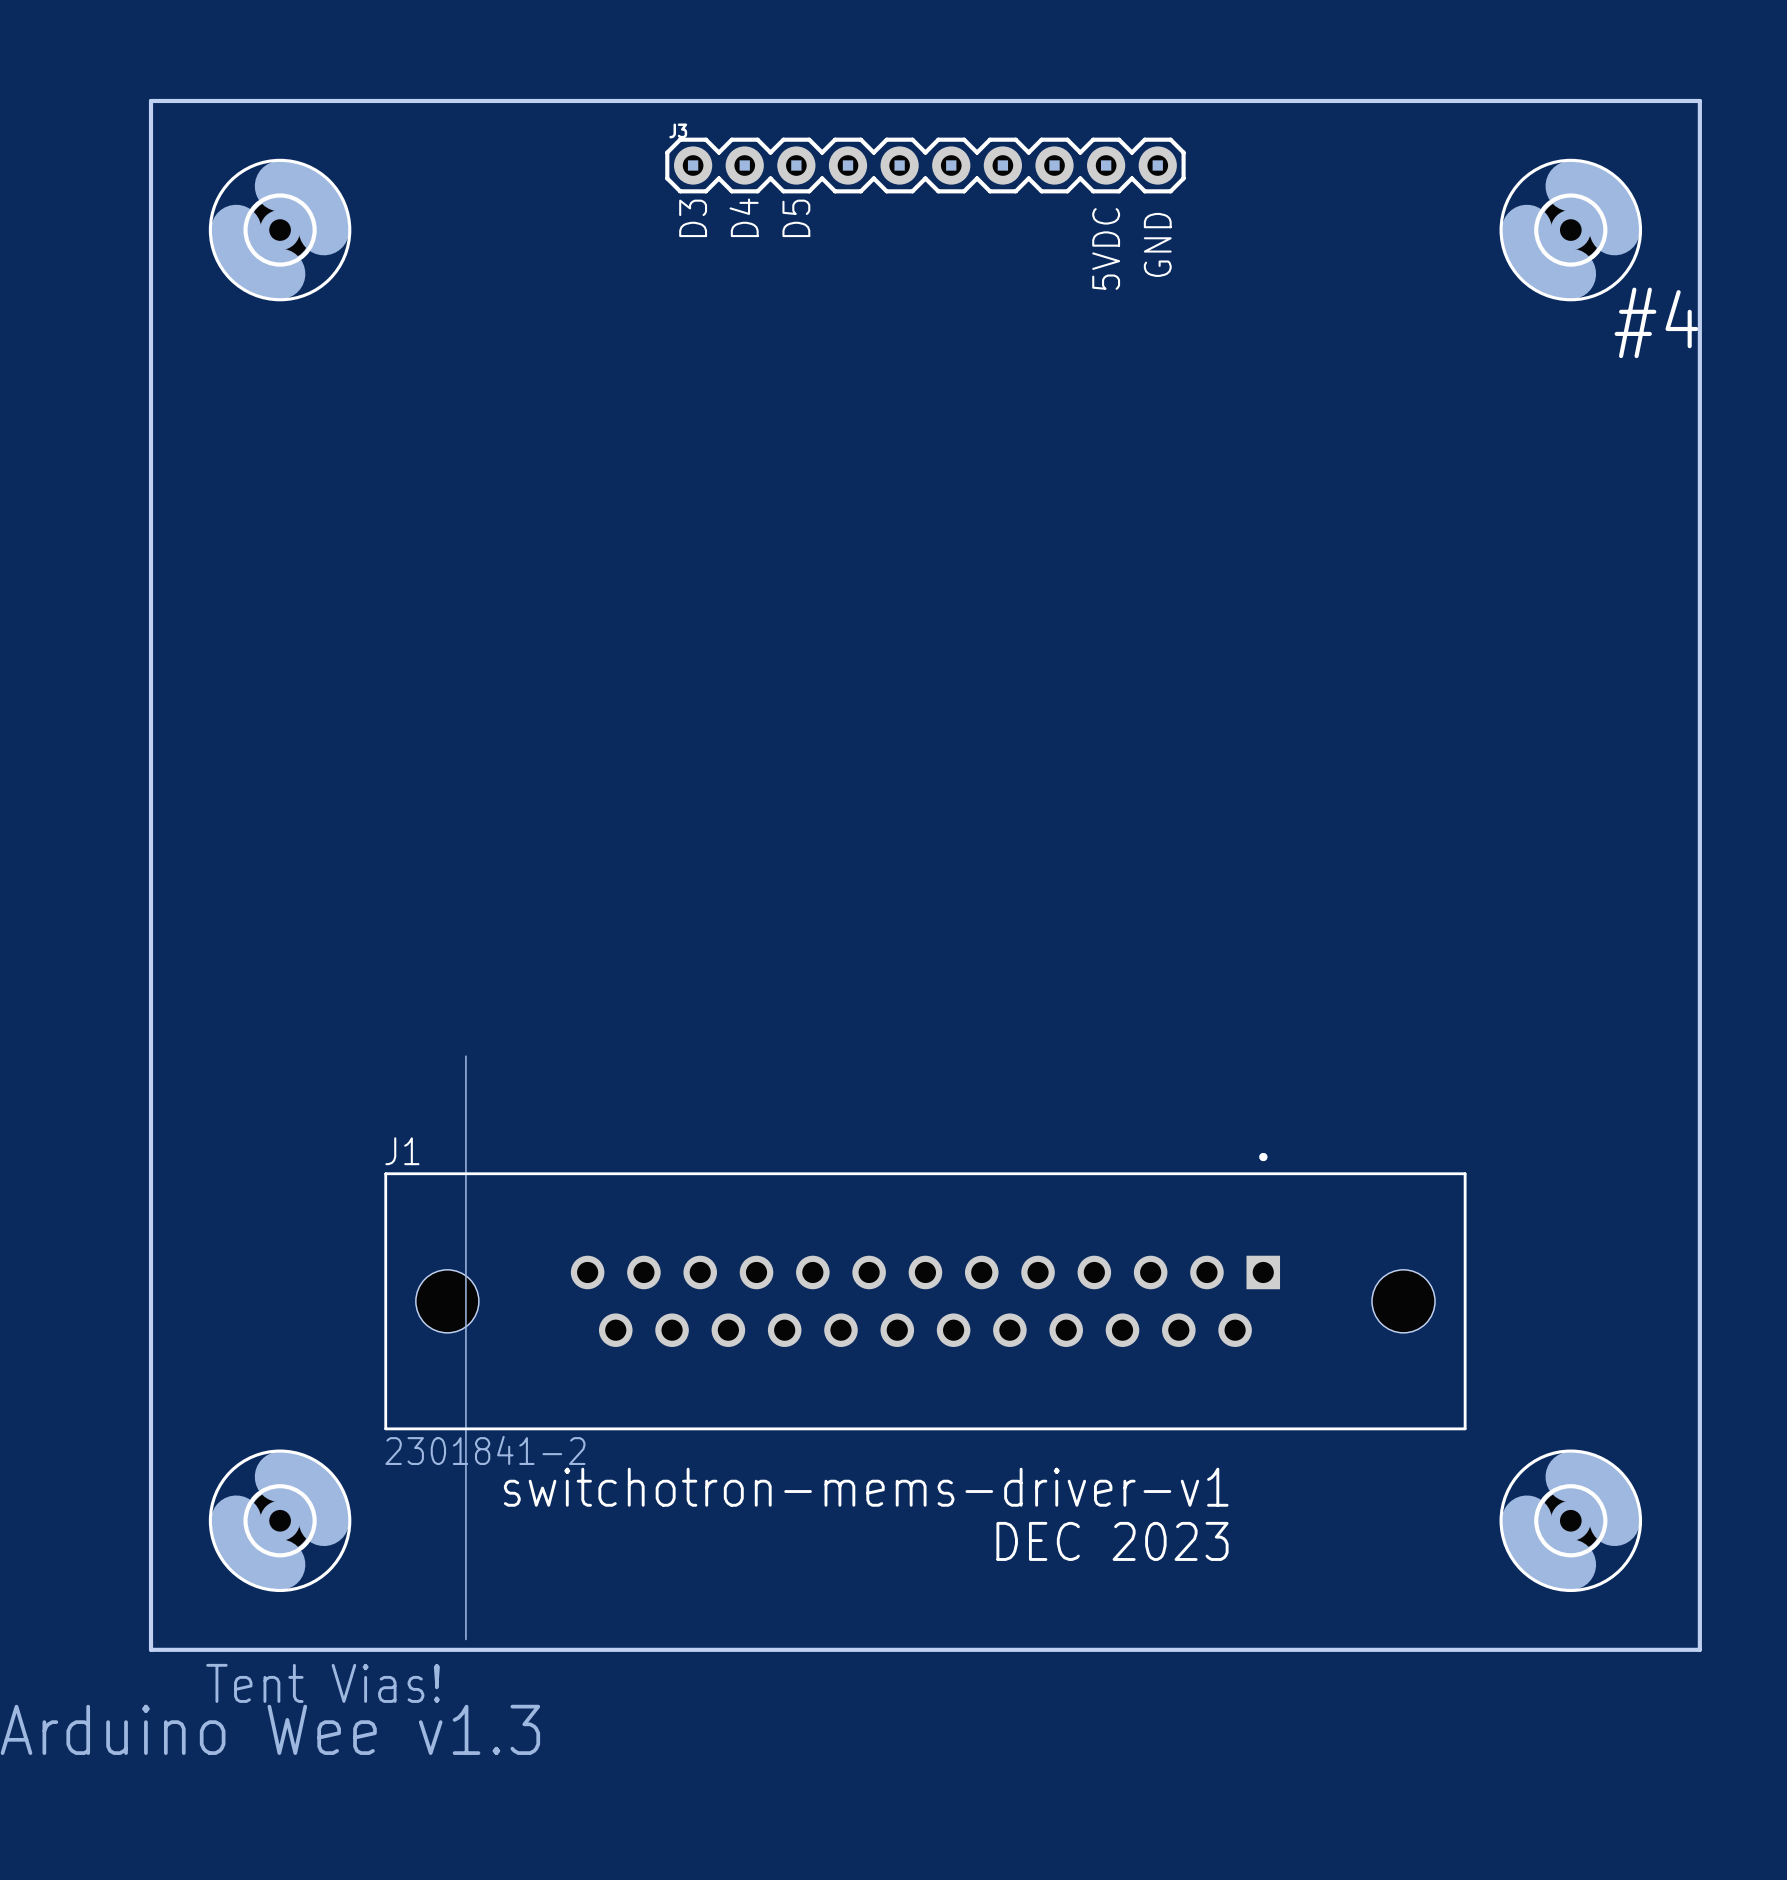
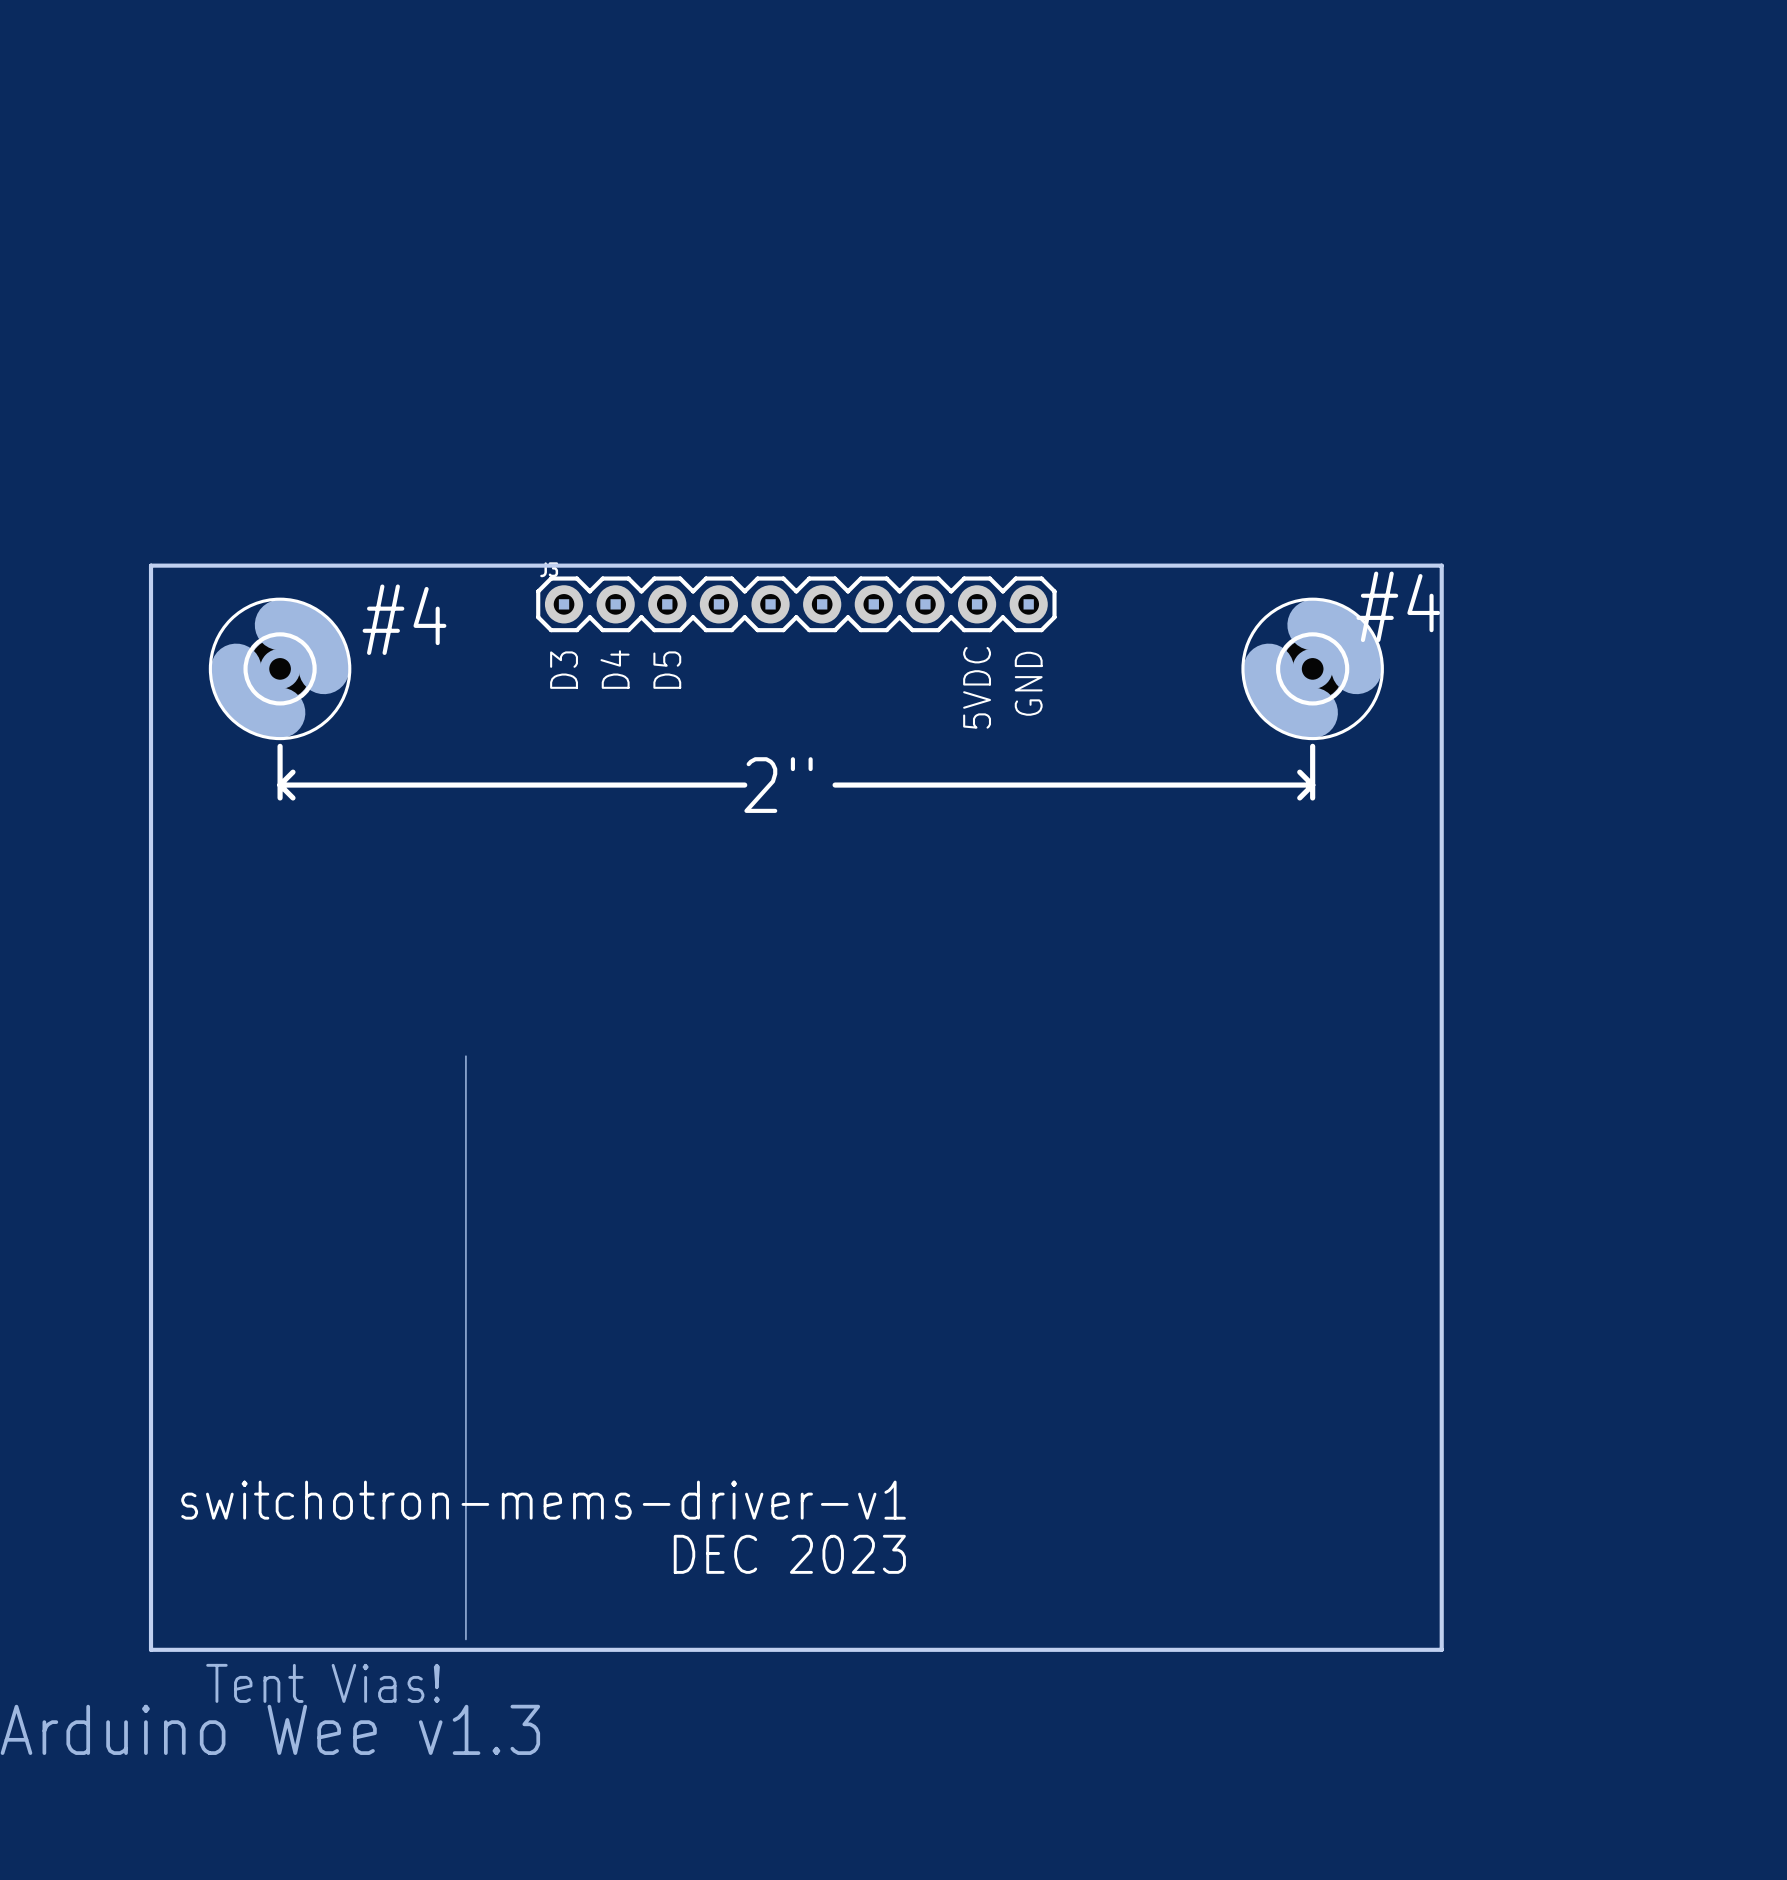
J3 position: (925, 165) -> (796, 604)
text position: D4 (744, 217) -> D4 (615, 669)
text position: D3 (693, 218) -> D3 (564, 670)
text position: D5 (796, 218) -> D5 (667, 670)
part: (280, 230) -> none
part: (1570, 230) -> none
text position: GND (1157, 244) -> GND (1028, 683)
text position: 5VDC (1106, 248) -> 5VDC (977, 687)
text position: #4 (1656, 322) -> #4 (1398, 606)
board edge: (151, 565) (151, 100) (1699, 100) (1699, 1649) (1441, 1649) -> (151, 565) (1441, 565) (1441, 1649)
text: none -> #4 (404, 619)
part: none -> (280, 668)
part: none -> (1312, 668)
line: none -> (280, 746) (280, 797)
line: none -> (1312, 746) (1312, 797)
line: none -> (292, 772) (280, 785)
line: none -> (1299, 772) (1312, 785)
line: none -> (280, 785) (744, 785)
line: none -> (280, 785) (292, 797)
text: none -> 2" (778, 785)
line: none -> (835, 785) (1312, 785)
line: none -> (1312, 785) (1299, 797)
J1: 2301841-2 (925, 1291) -> none
text position: switchotron-mems-driver-v1 (866, 1487) -> switchotron-mems-driver-v1 (543, 1500)
part: (280, 1520) -> none
part: (1570, 1520) -> none
text position: DEC 2023 (1112, 1541) -> DEC 2023 (789, 1554)

